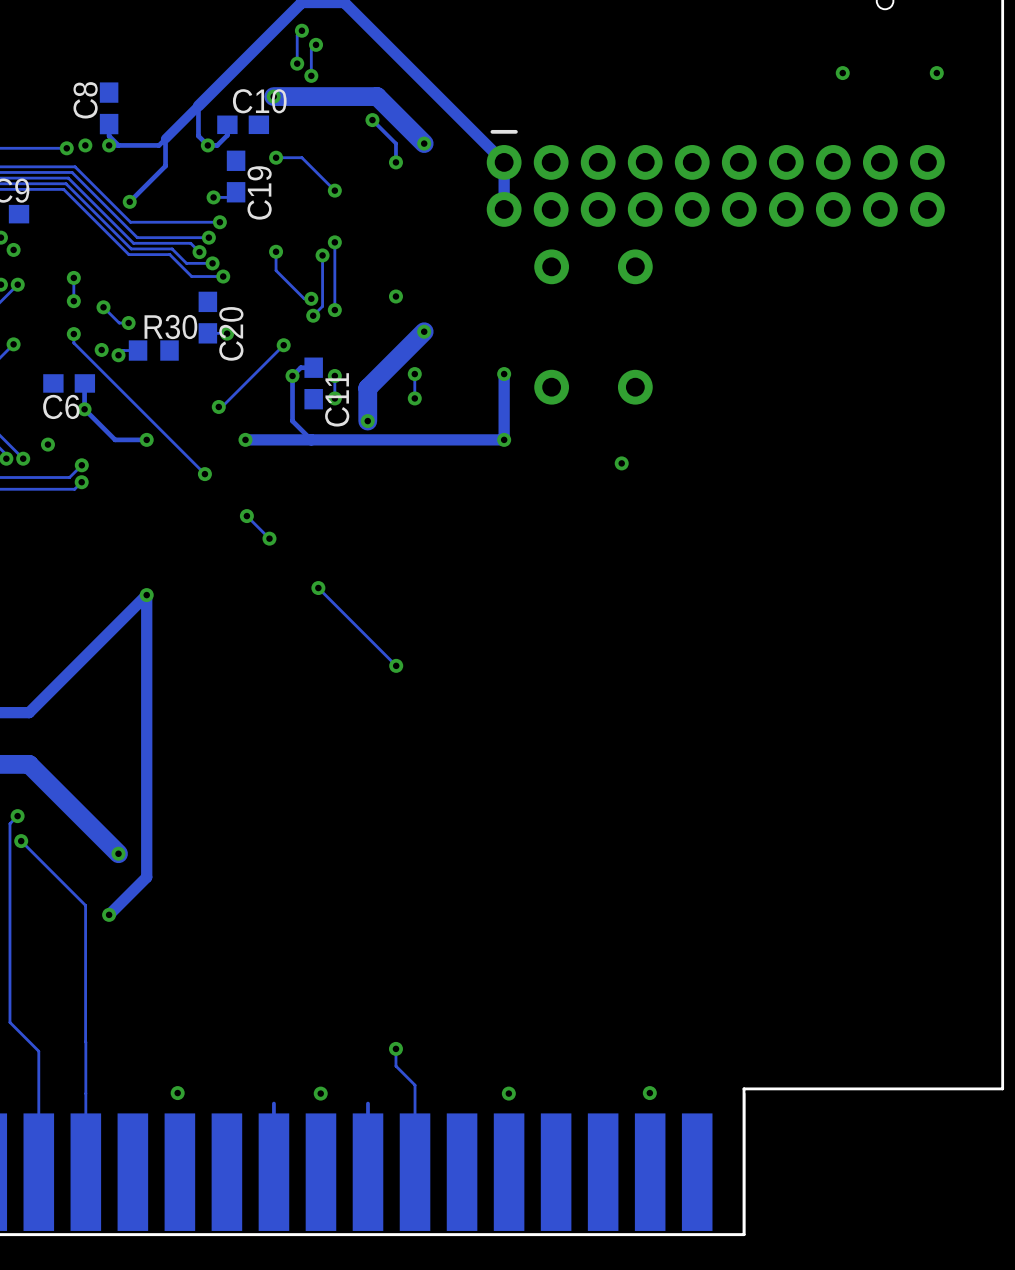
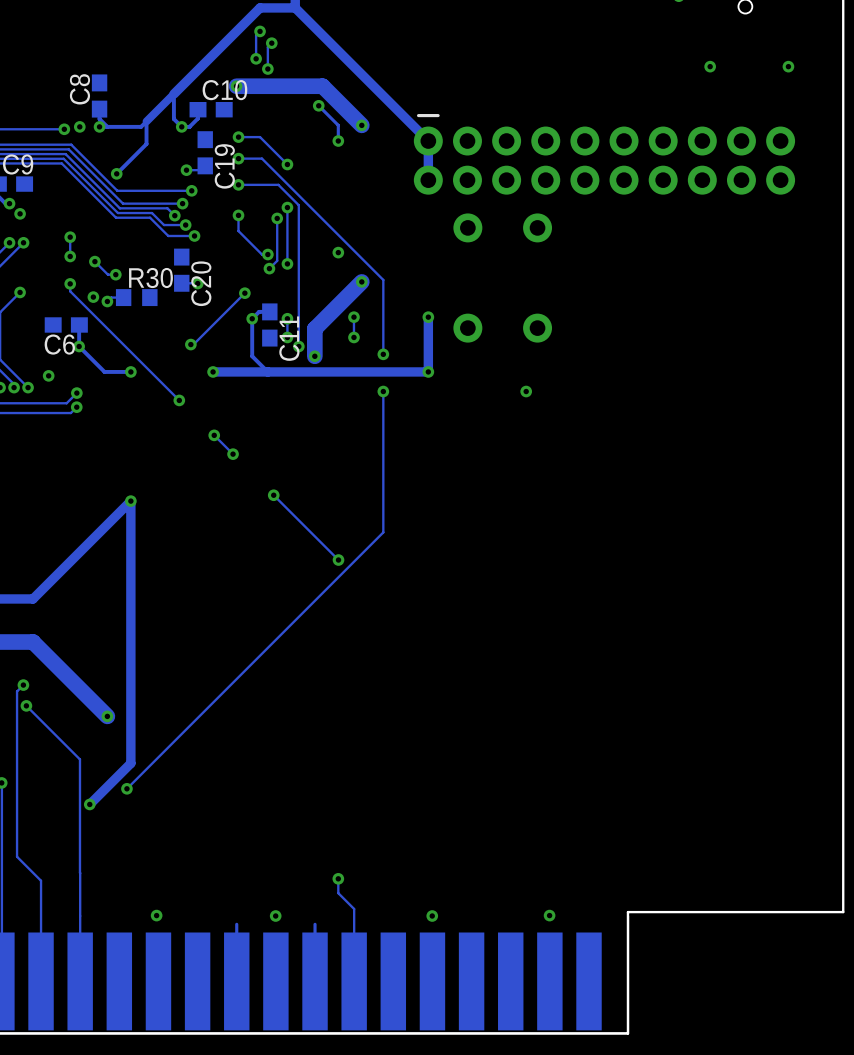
track: none -> (238, 158) (261, 158) (383, 279) (383, 354)
via: none -> (238, 158)
track: none -> (238, 184) (278, 184) (298, 205) (298, 346)
via: none -> (238, 184)
via: none -> (298, 346)
via: none -> (383, 354)
track: none -> (383, 391) (383, 532) (126, 788)
via: none -> (383, 391)
track: (146, 877) (109, 914) -> (130, 735) (130, 763) (89, 804)
via: (109, 914) -> none
via: none -> (126, 788)
via: none -> (89, 804)

